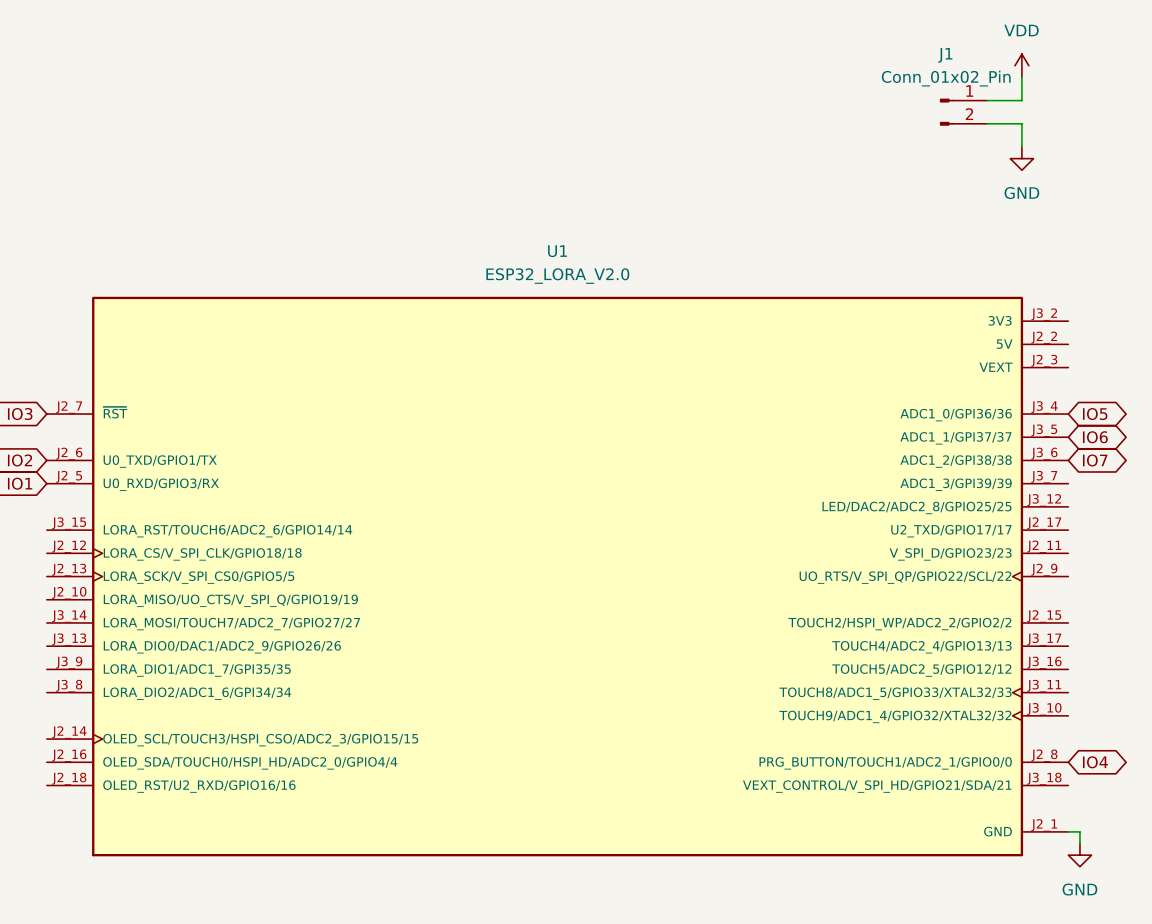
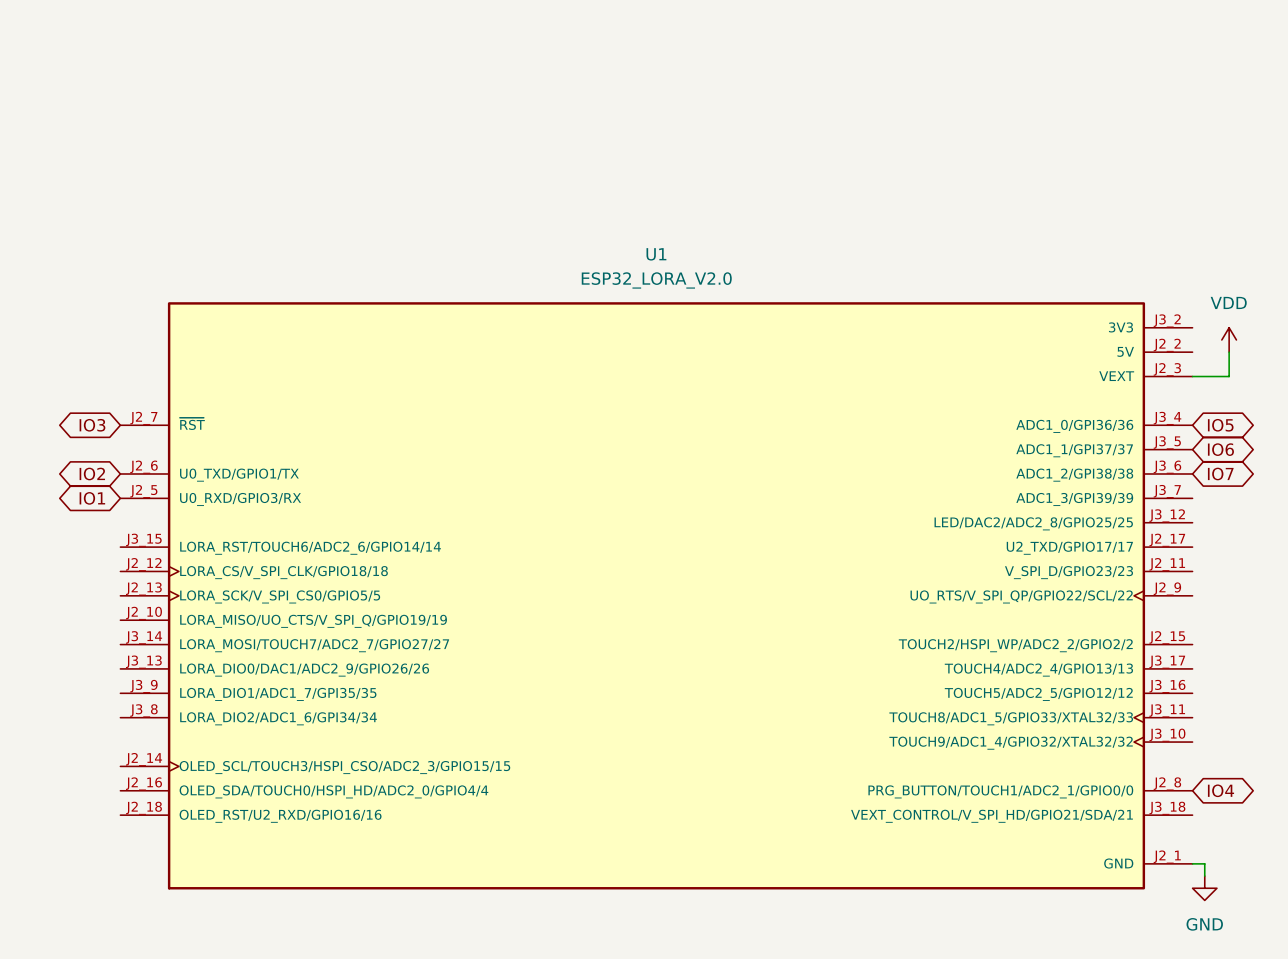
power symbol: VDD (1021, 65) -> none
wire: (1021, 77) (1021, 100) (987, 100) -> none
J1: Conn_01x02_Pin (963, 112) -> none
wire: (987, 123) (1021, 123) (1021, 147) -> none
power symbol: GND (1021, 158) -> none
power symbol: none -> VDD (1229, 339)
wire: none -> (1229, 352) (1229, 376) (1192, 376)

